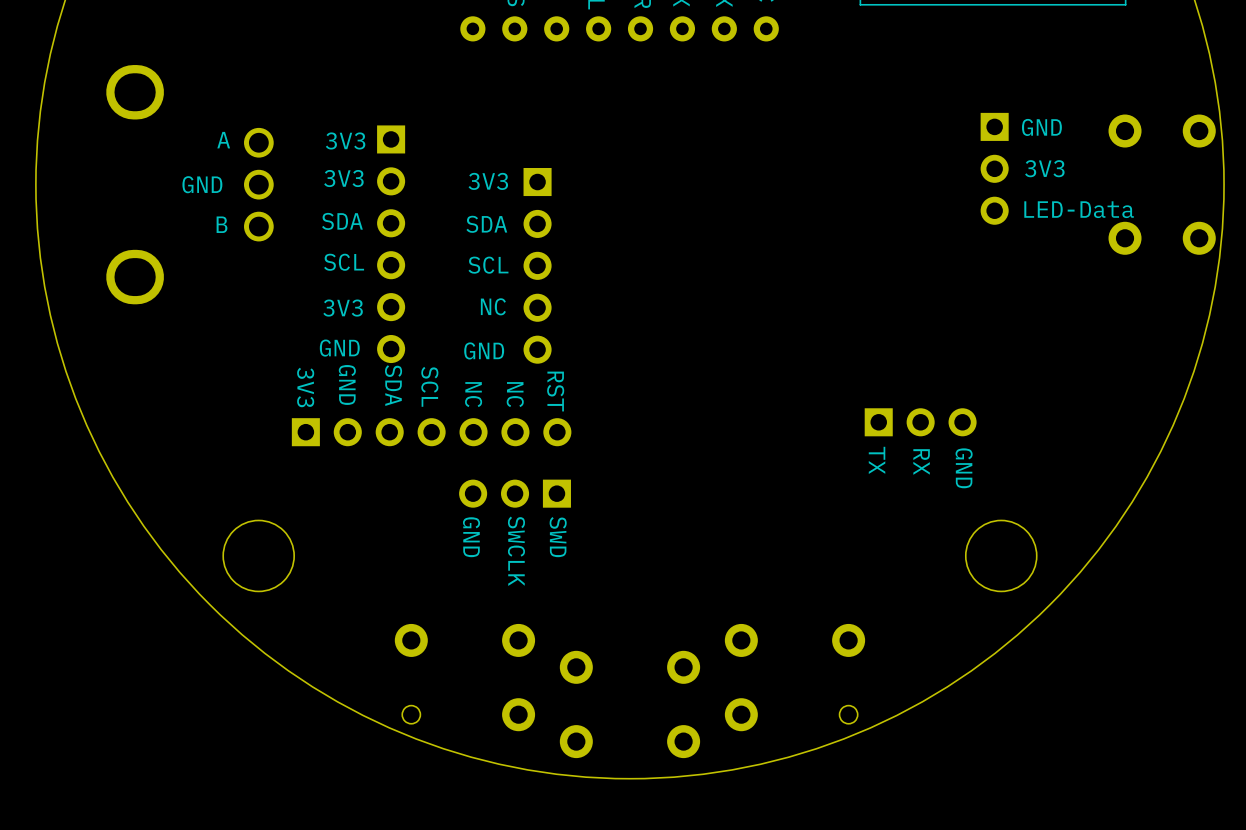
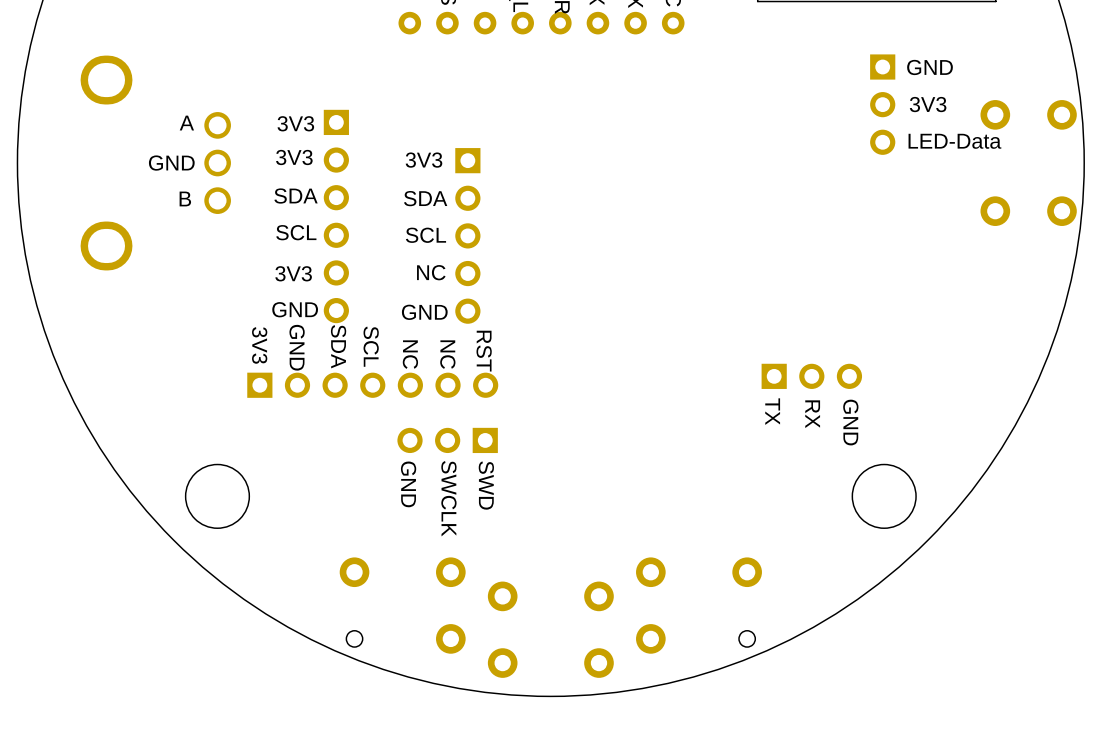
text: none -> GND (930, 67)
text: GND (1041, 127) -> 3V3 (928, 104)
part position: (994, 168) -> (882, 104)
text: 3V3 (1044, 168) -> LED-Data (954, 141)
text: LED-Data (1079, 209) -> none

